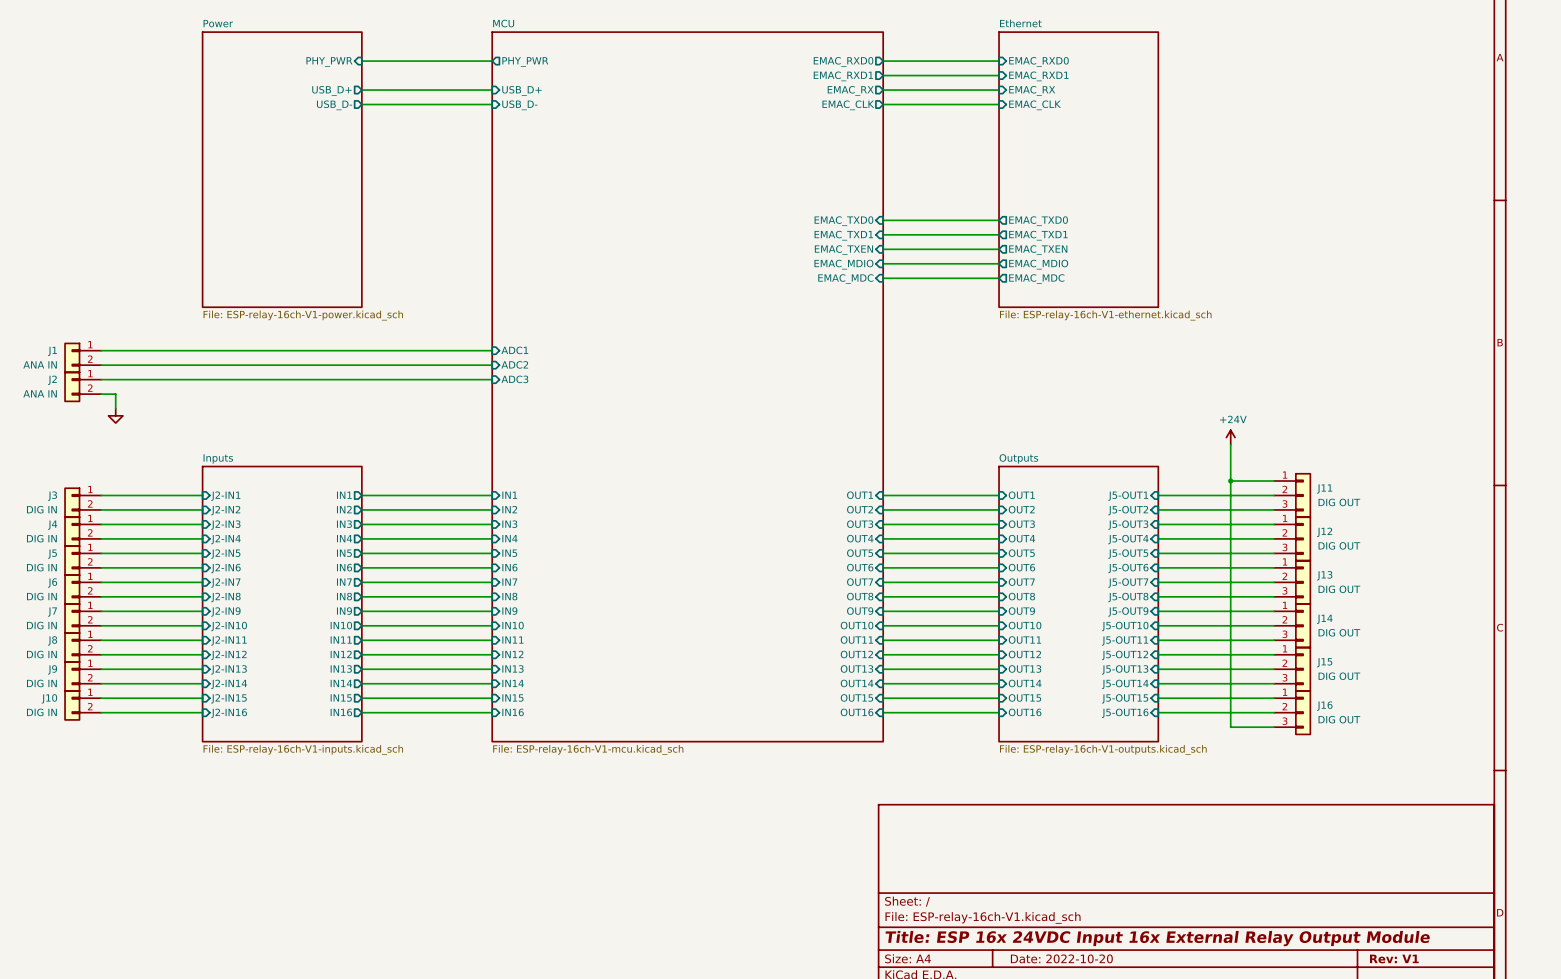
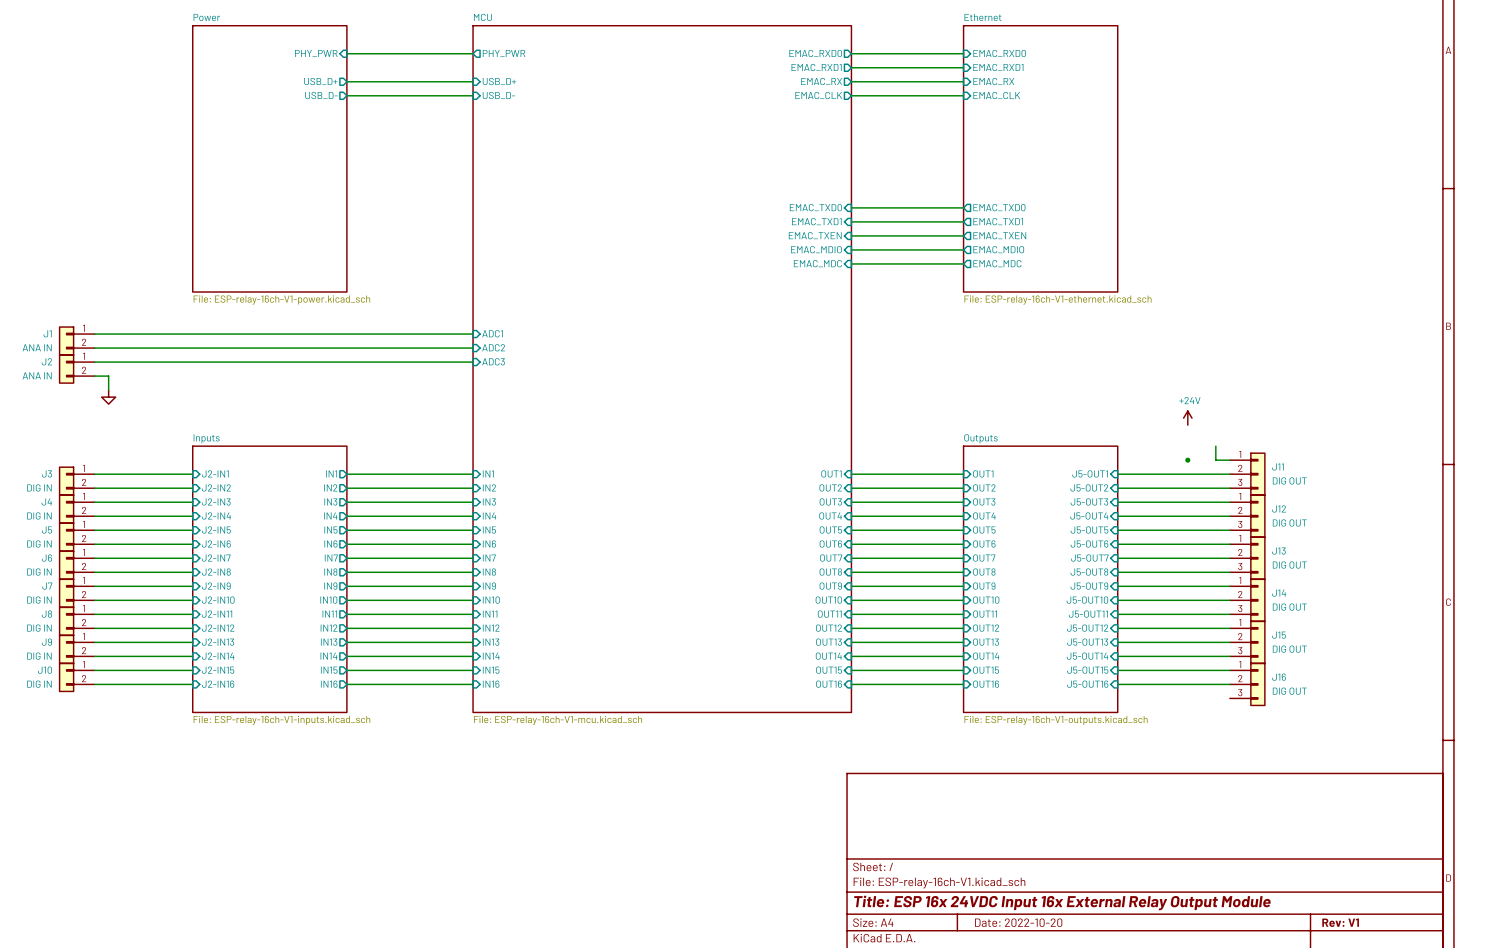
wire: (1230, 444) (1230, 727) (1274, 727) -> none
wire: (1230, 481) (1259, 481) -> (1215, 446) (1215, 460)

